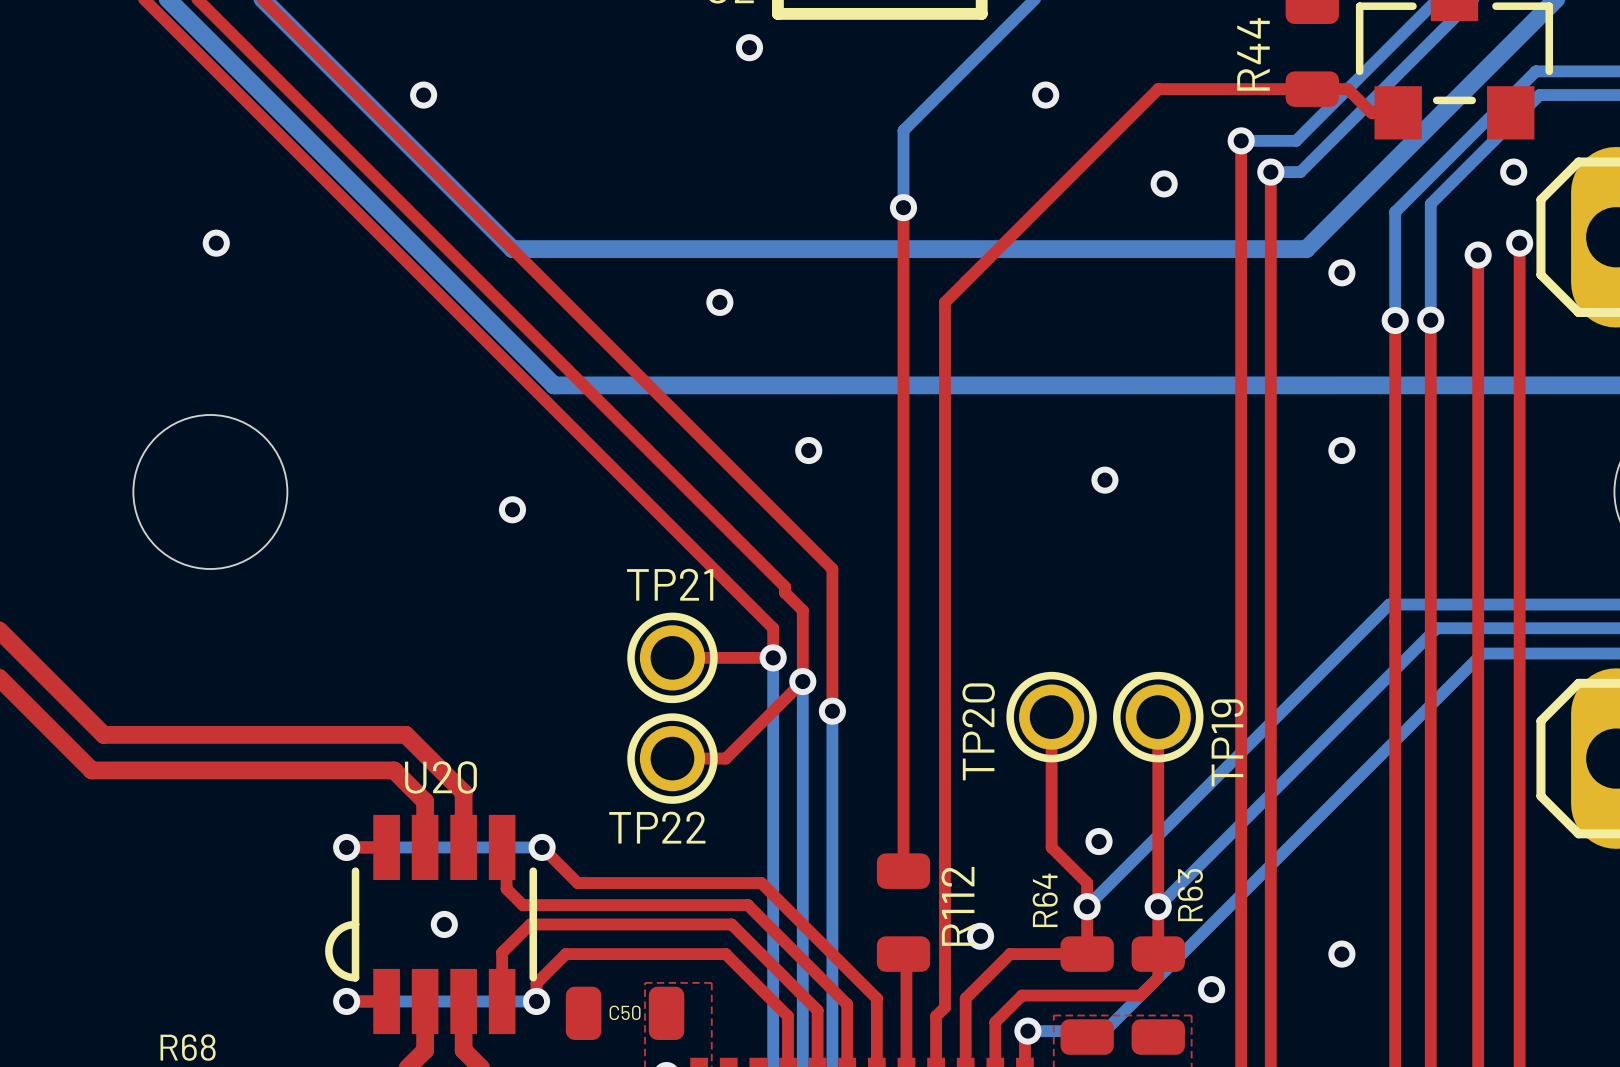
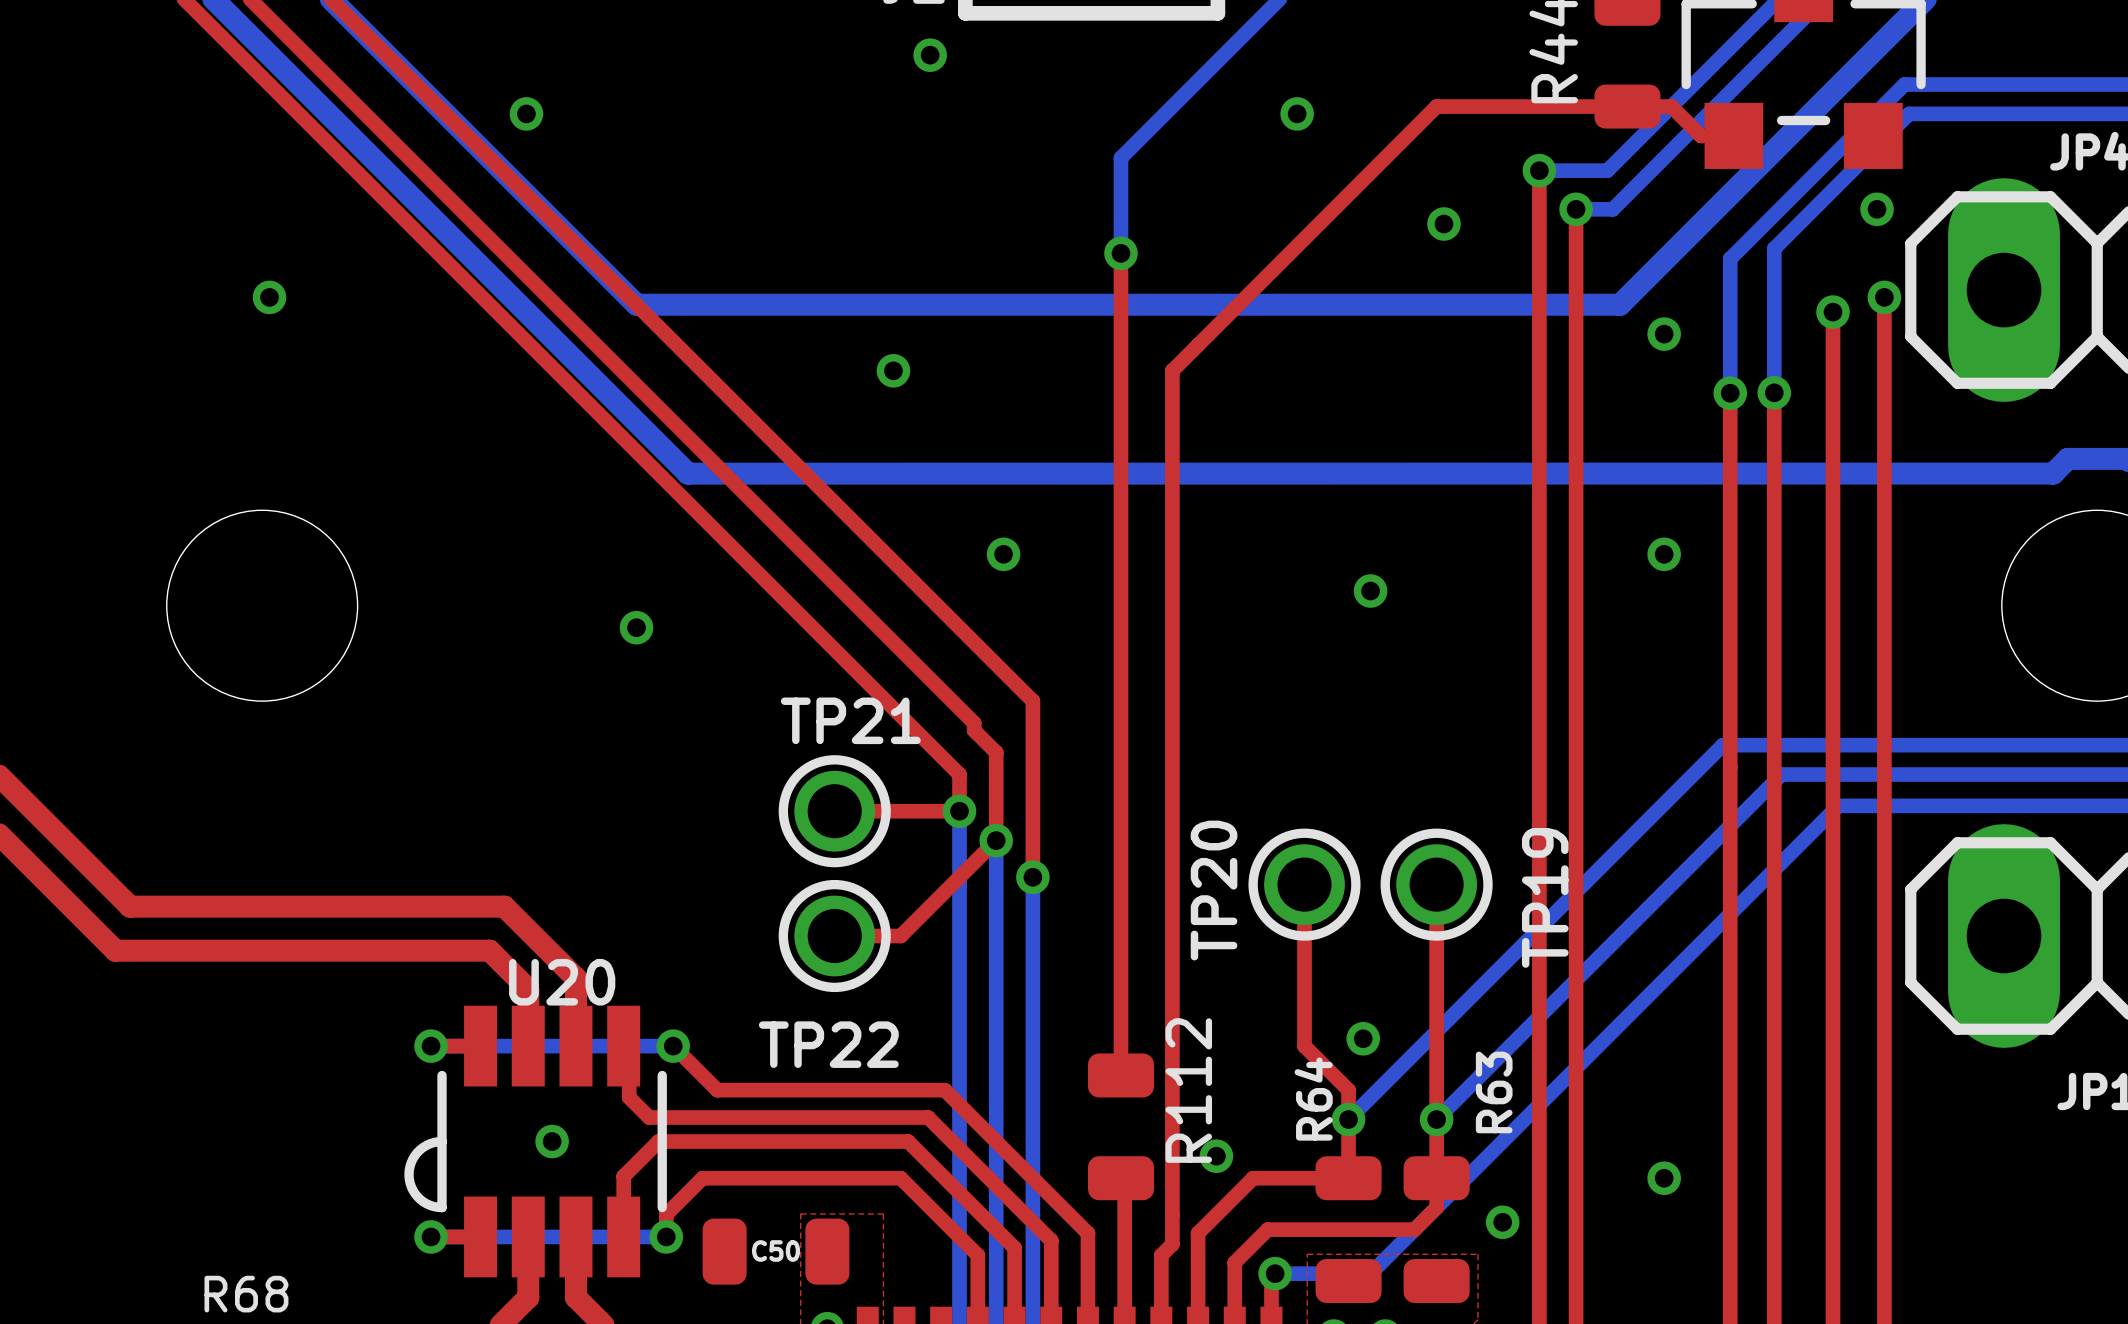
TP19 name position: TP19 (1227, 742) -> TP19 (1545, 897)
U20 name position: U20 (440, 777) -> U20 (562, 982)
TP22 name position: TP22 (657, 827) -> TP22 (828, 1044)
R63 name position: R63 (1190, 895) -> R63 (1494, 1092)
R64 name position: R64 (1045, 900) -> R64 (1313, 1099)

